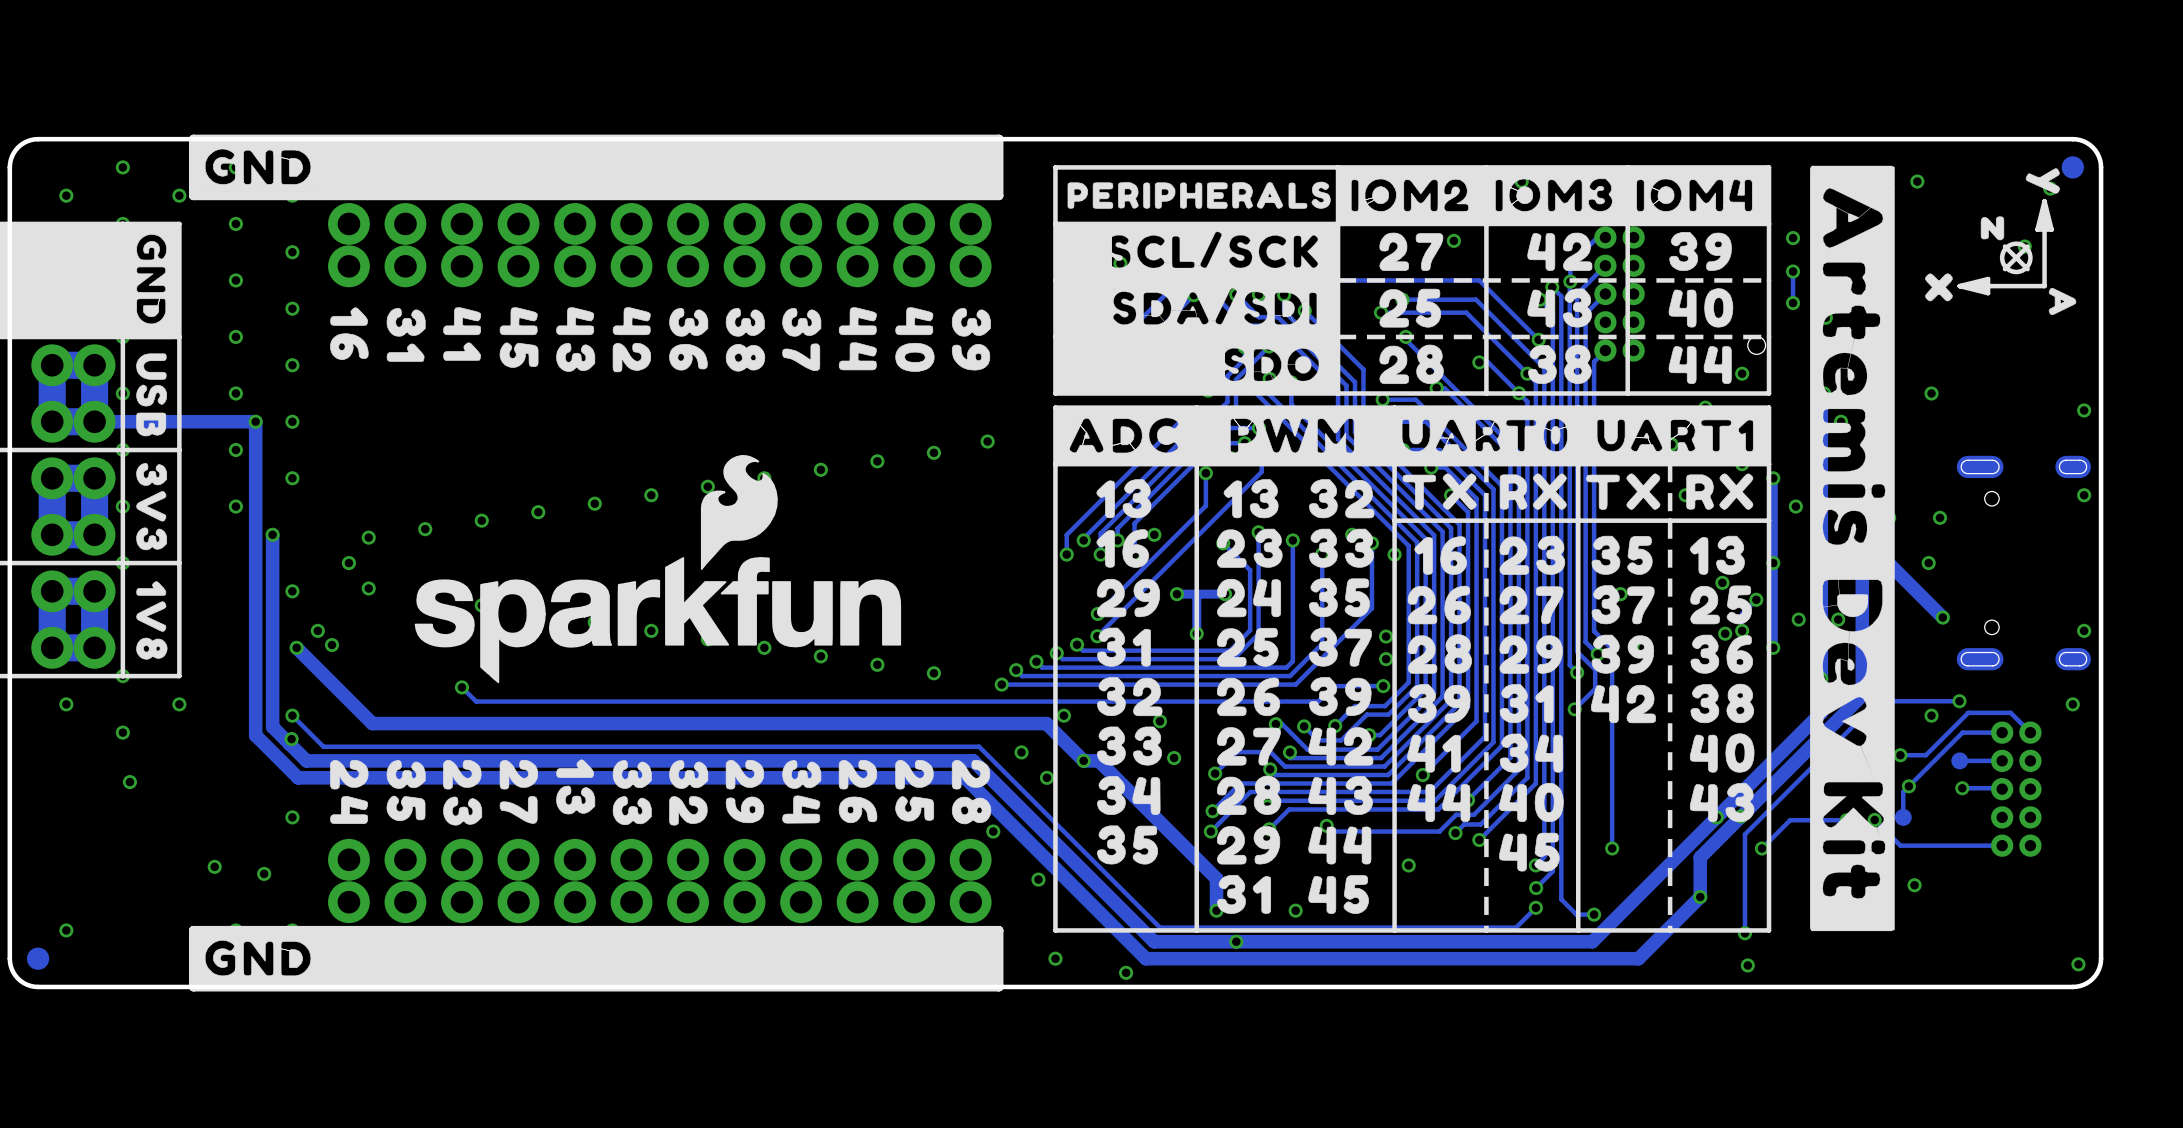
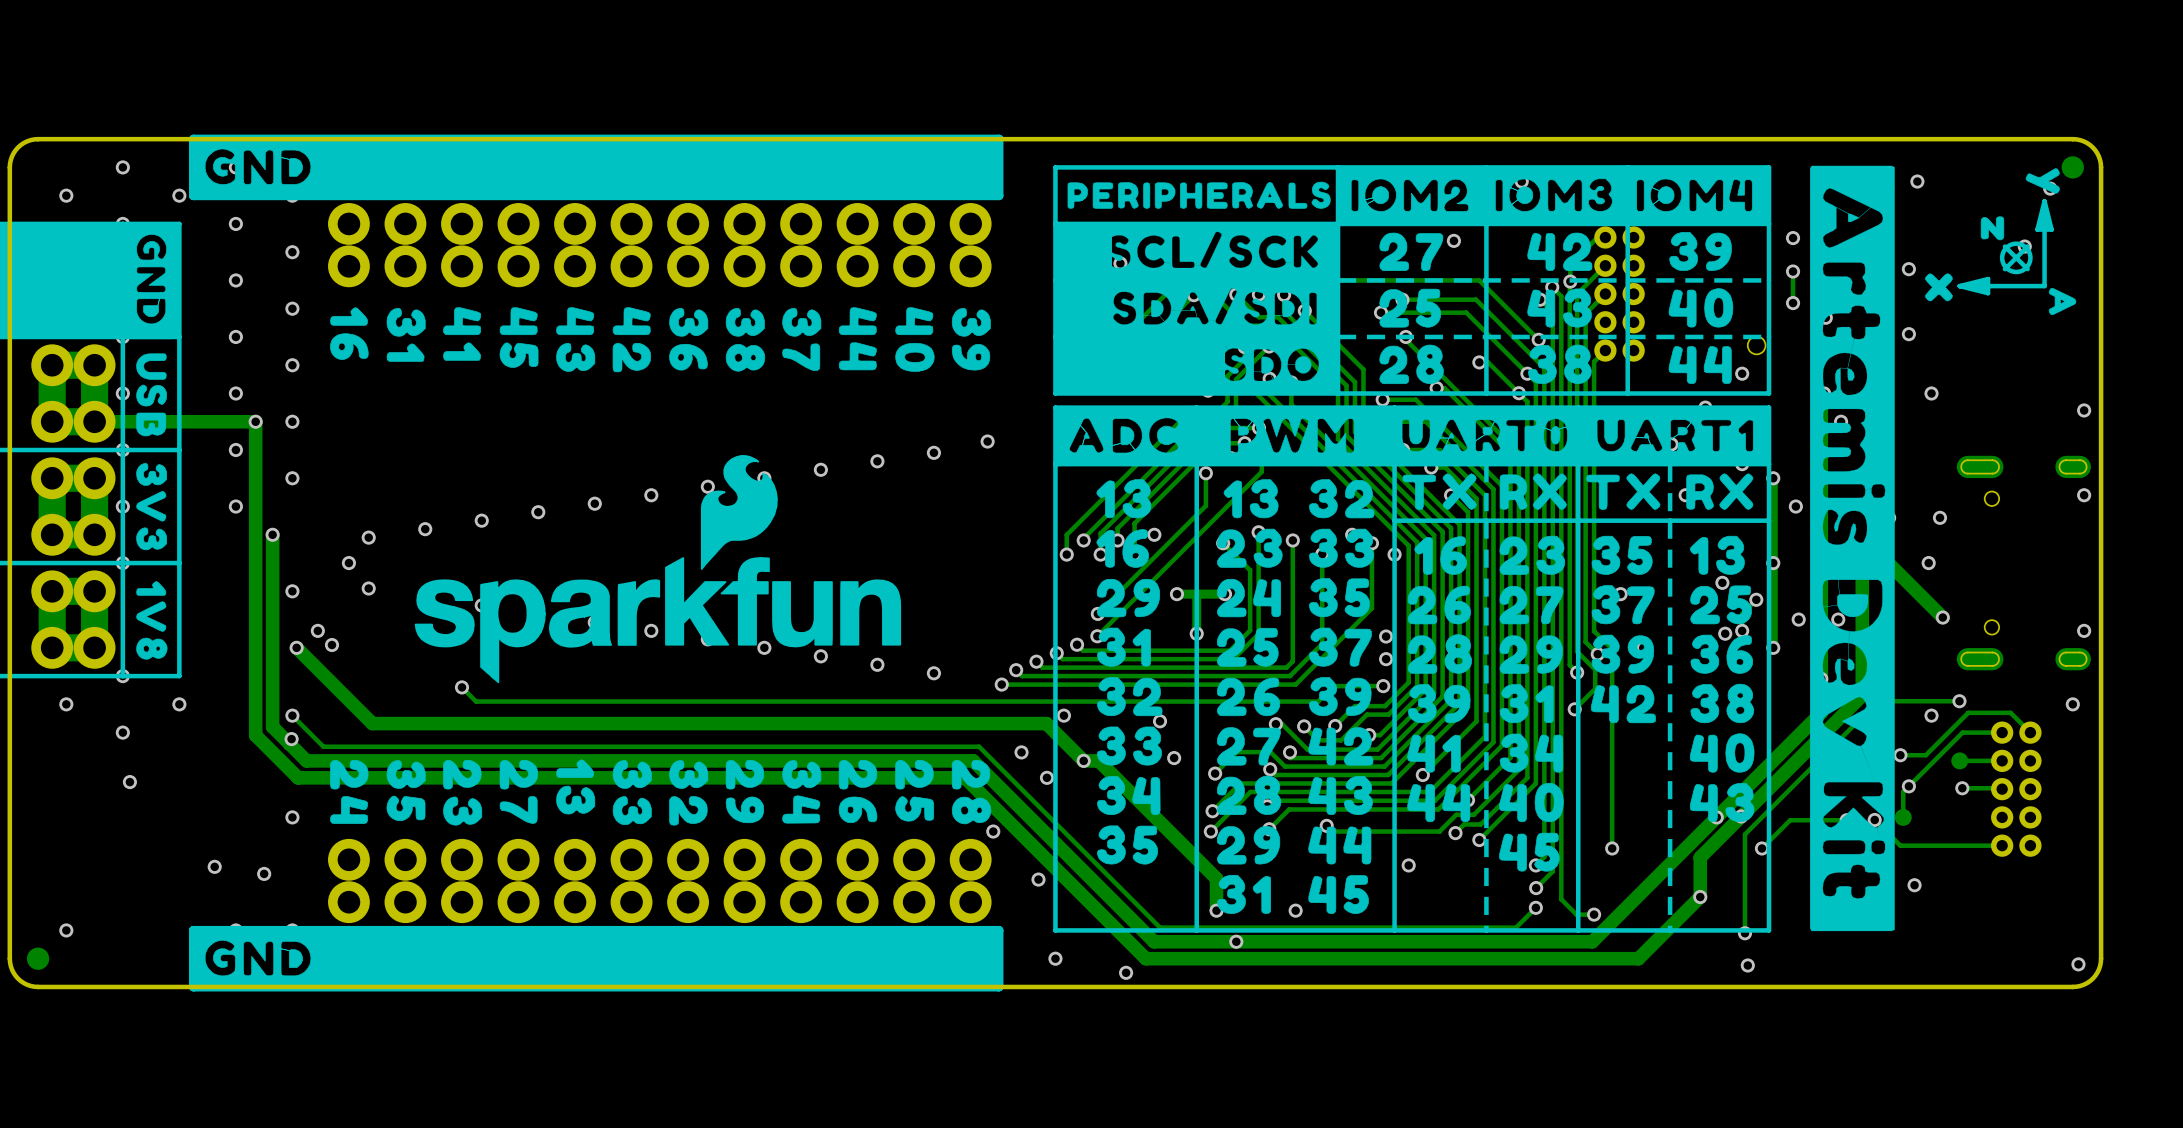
via: none -> (1908, 269)
via: none -> (1908, 334)

